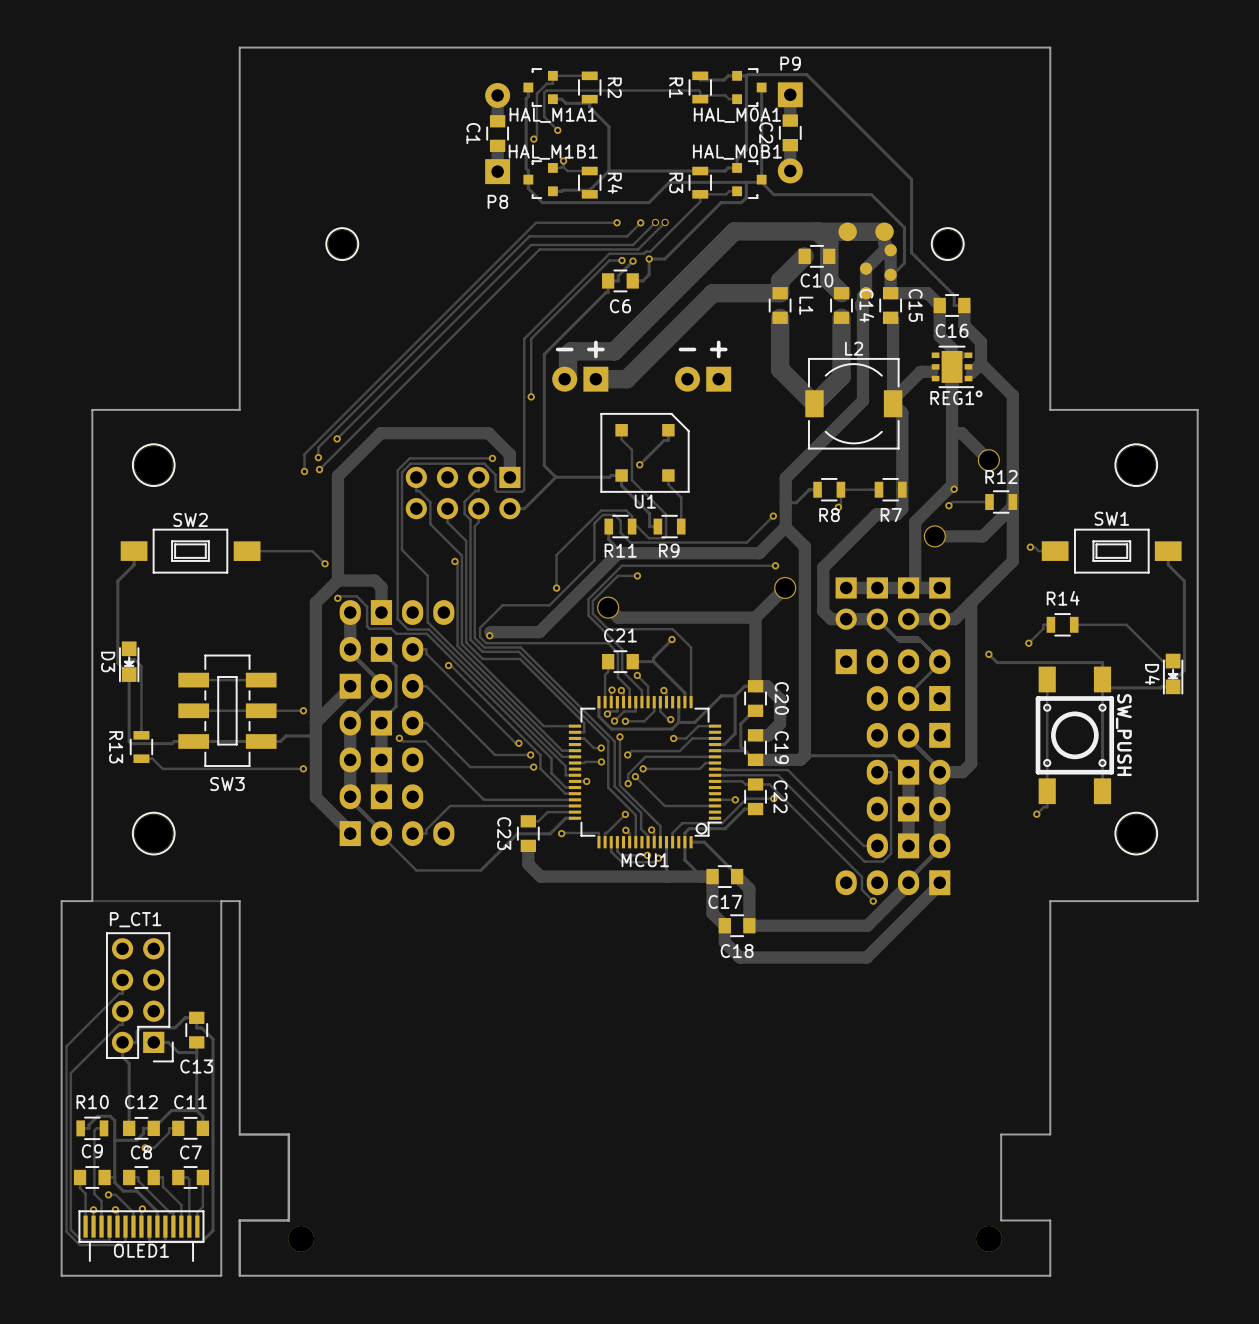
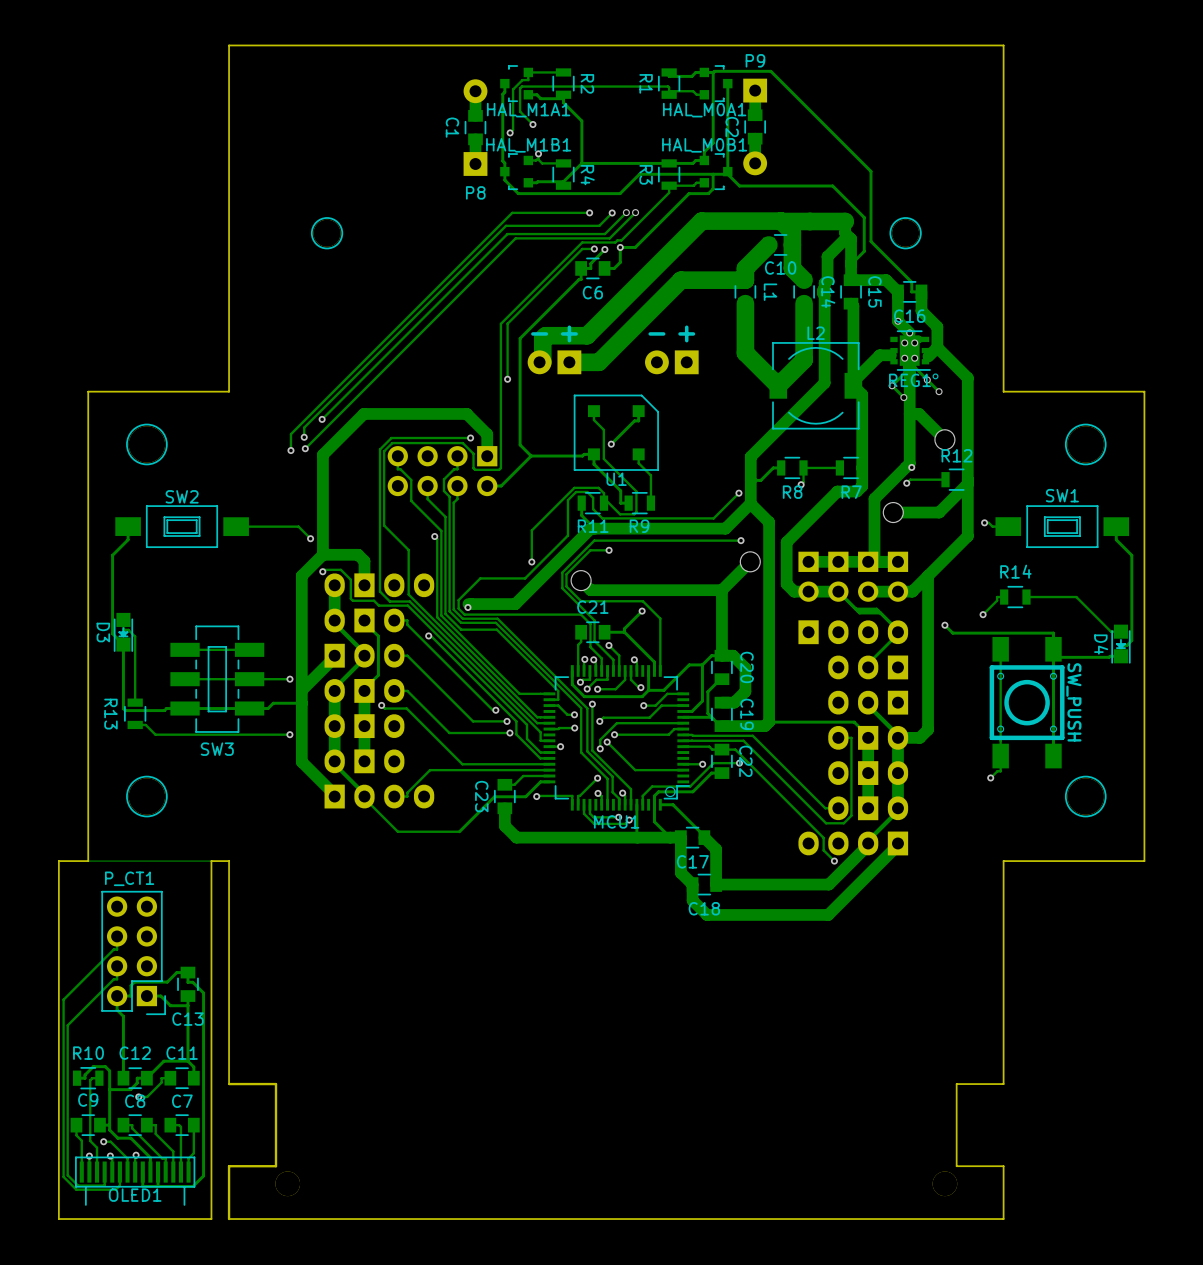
via: none -> (897, 321)
via: none -> (909, 332)
via: none -> (904, 342)
via: none -> (914, 342)
via: none -> (904, 358)
via: none -> (914, 358)
track: none -> (914, 367) (939, 391)
track: none -> (904, 367) (904, 373) (892, 385) (903, 397)
via: none -> (927, 379)
via: none -> (892, 385)
via: none -> (939, 391)
via: none -> (903, 397)

